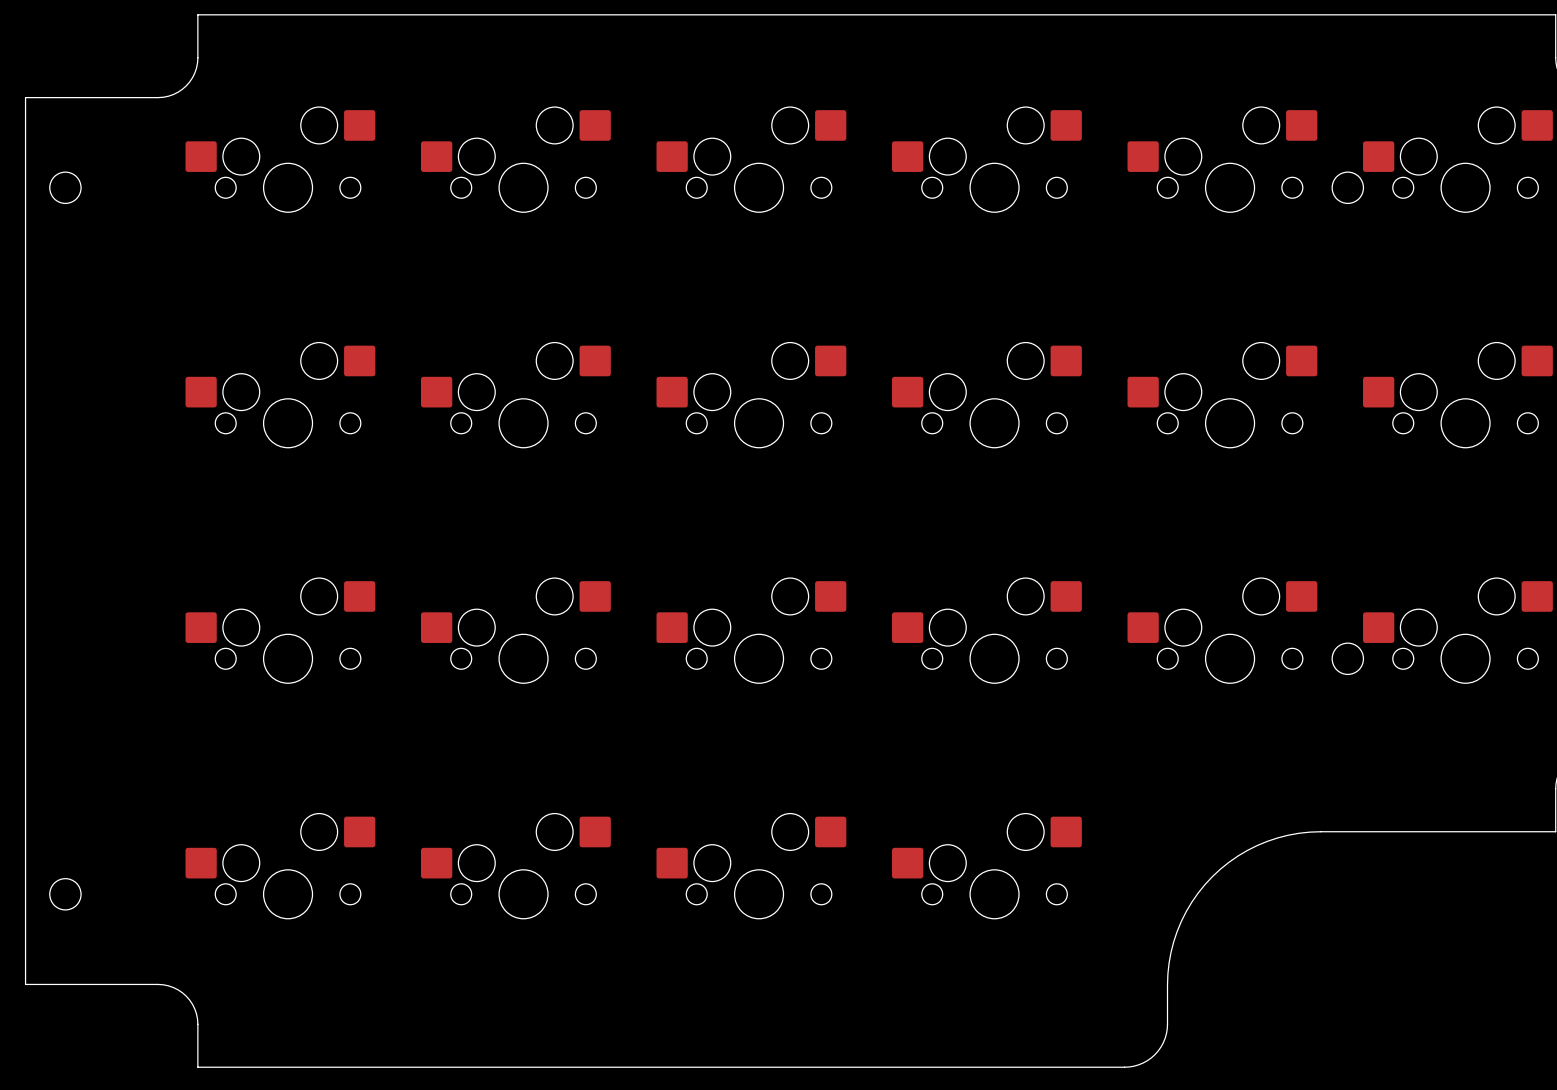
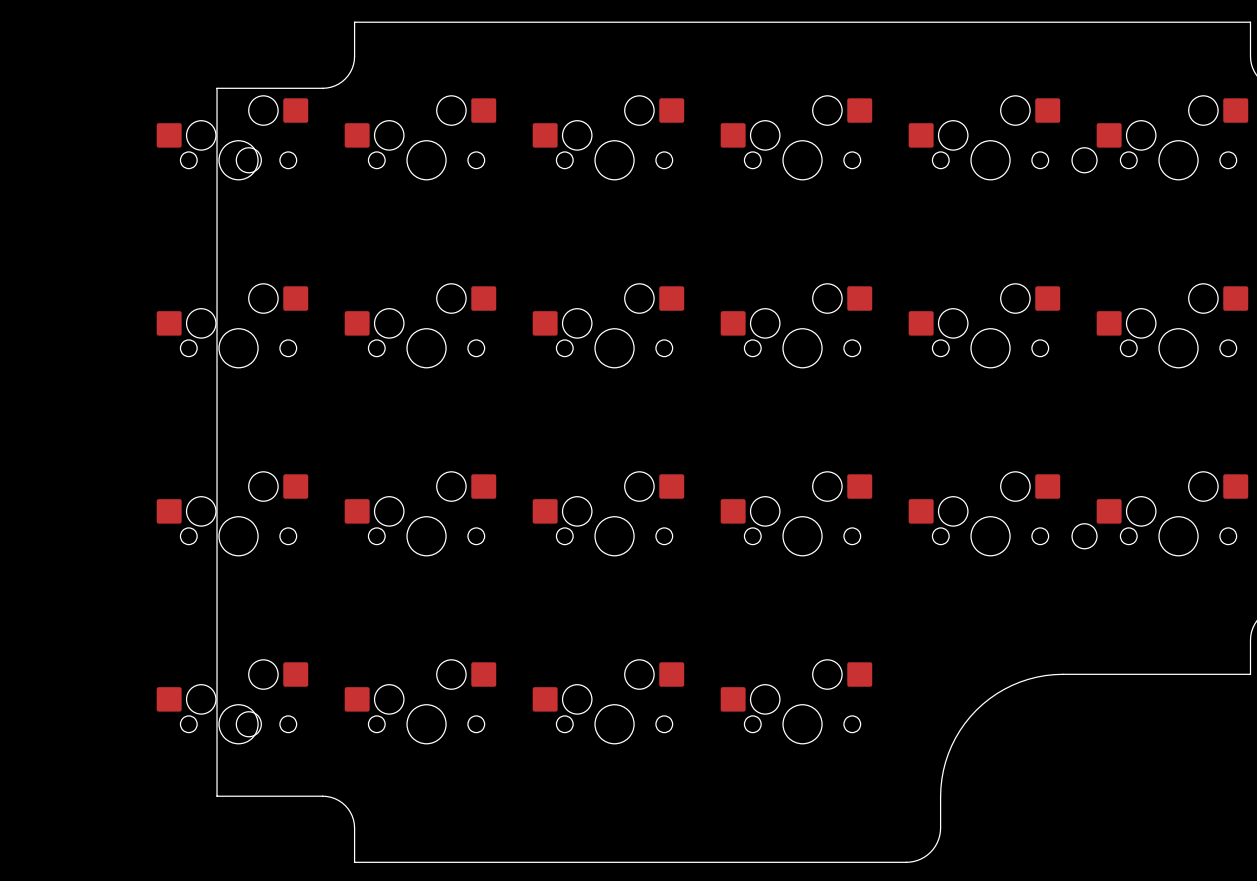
board edge: (433, 14) (197, 14) (196, 68) (189, 82) (173, 94) (158, 97) (25, 97) (25, 984) (158, 984) (173, 987) (189, 1000) (196, 1013) (197, 1067) (433, 1067) -> (354, 22) (353, 64) (345, 78) (334, 85) (322, 88) (217, 88) (217, 796) (322, 796) (334, 798) (348, 808) (353, 819) (354, 862)
round board edge position: (65, 187) -> (248, 160)
round board edge position: (65, 894) -> (248, 724)

